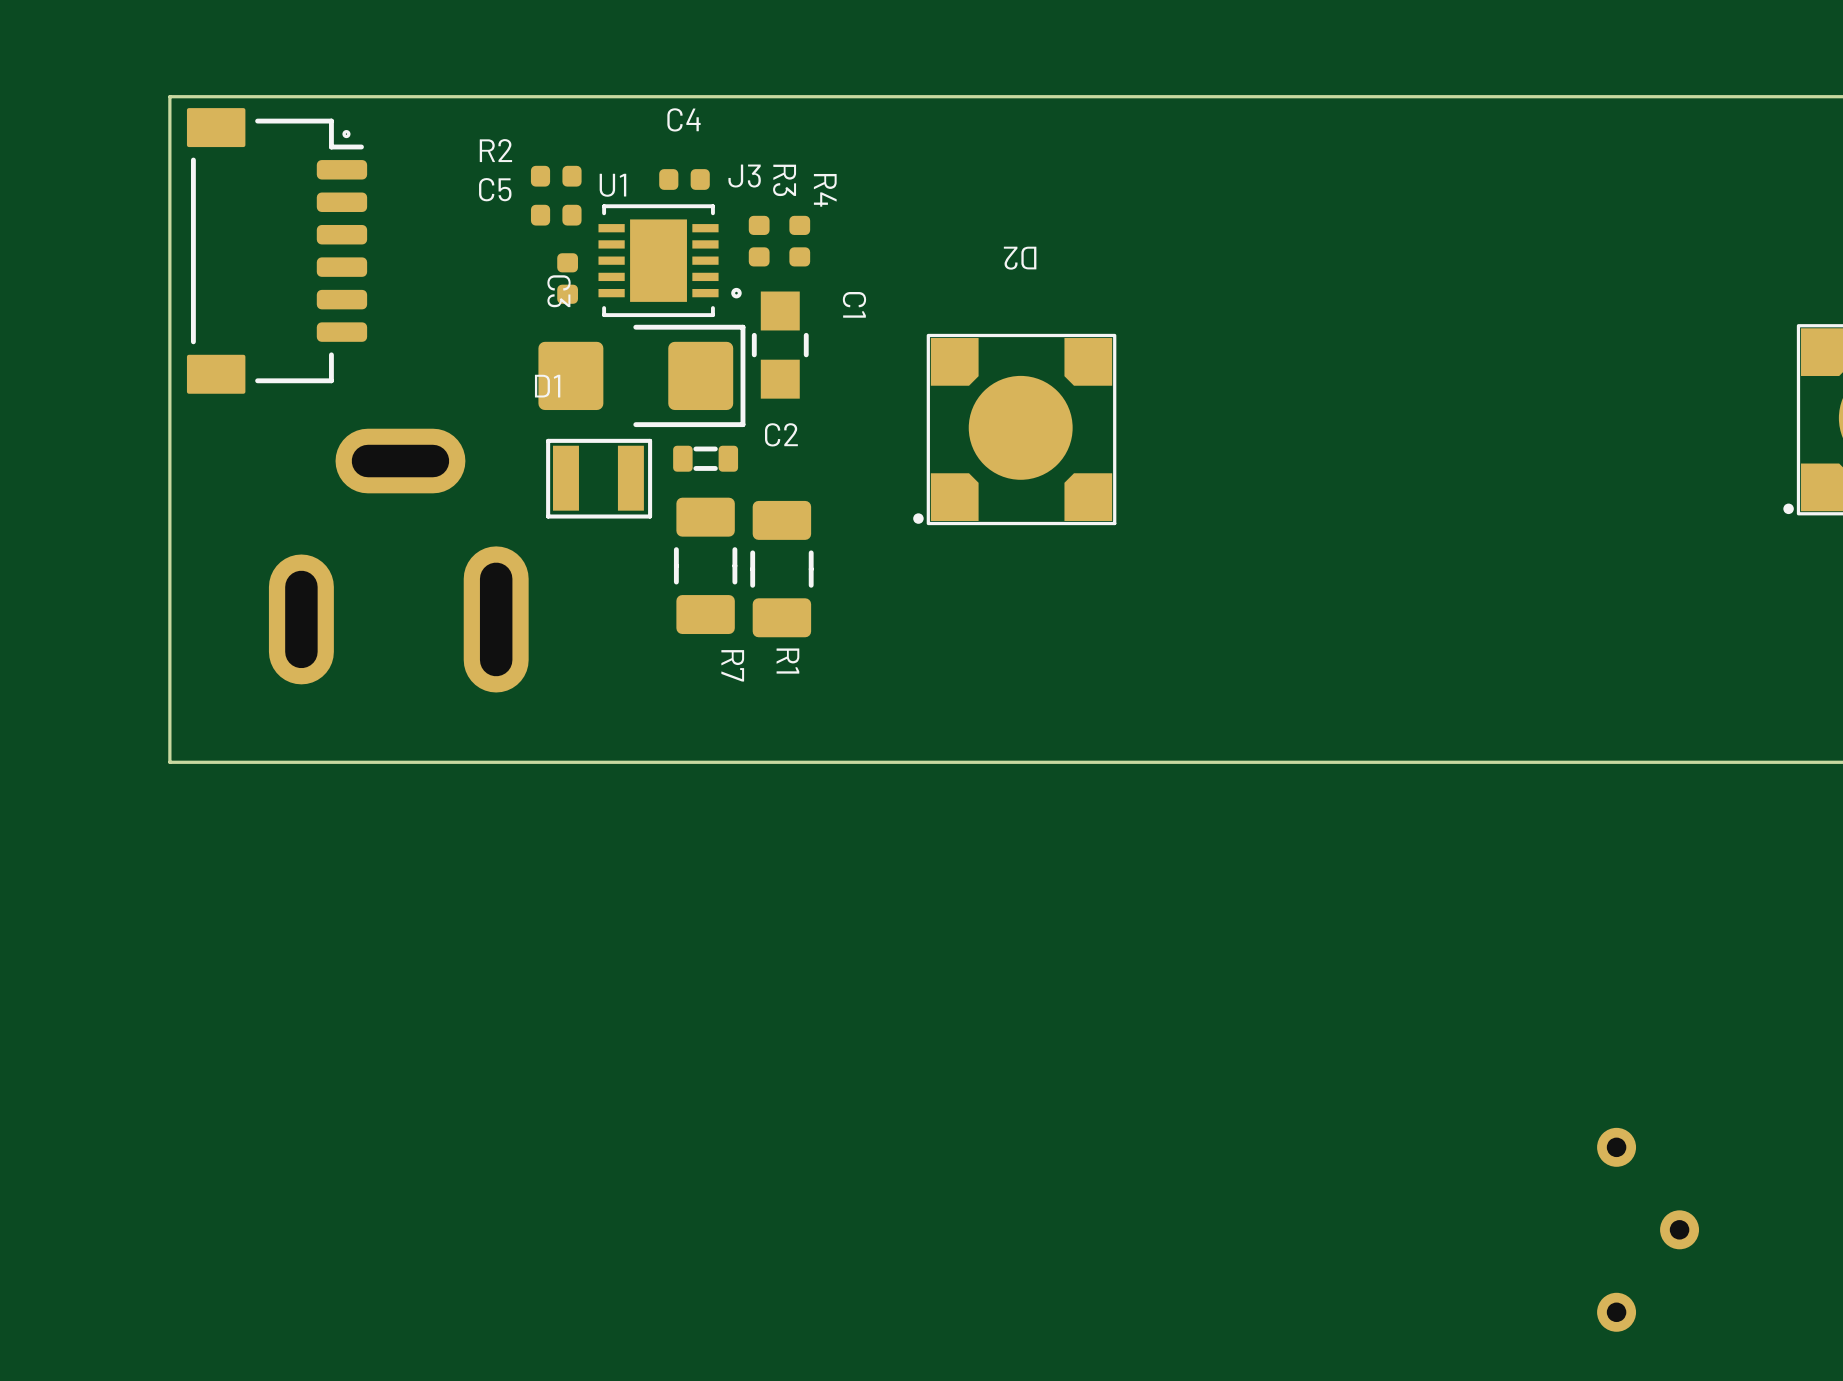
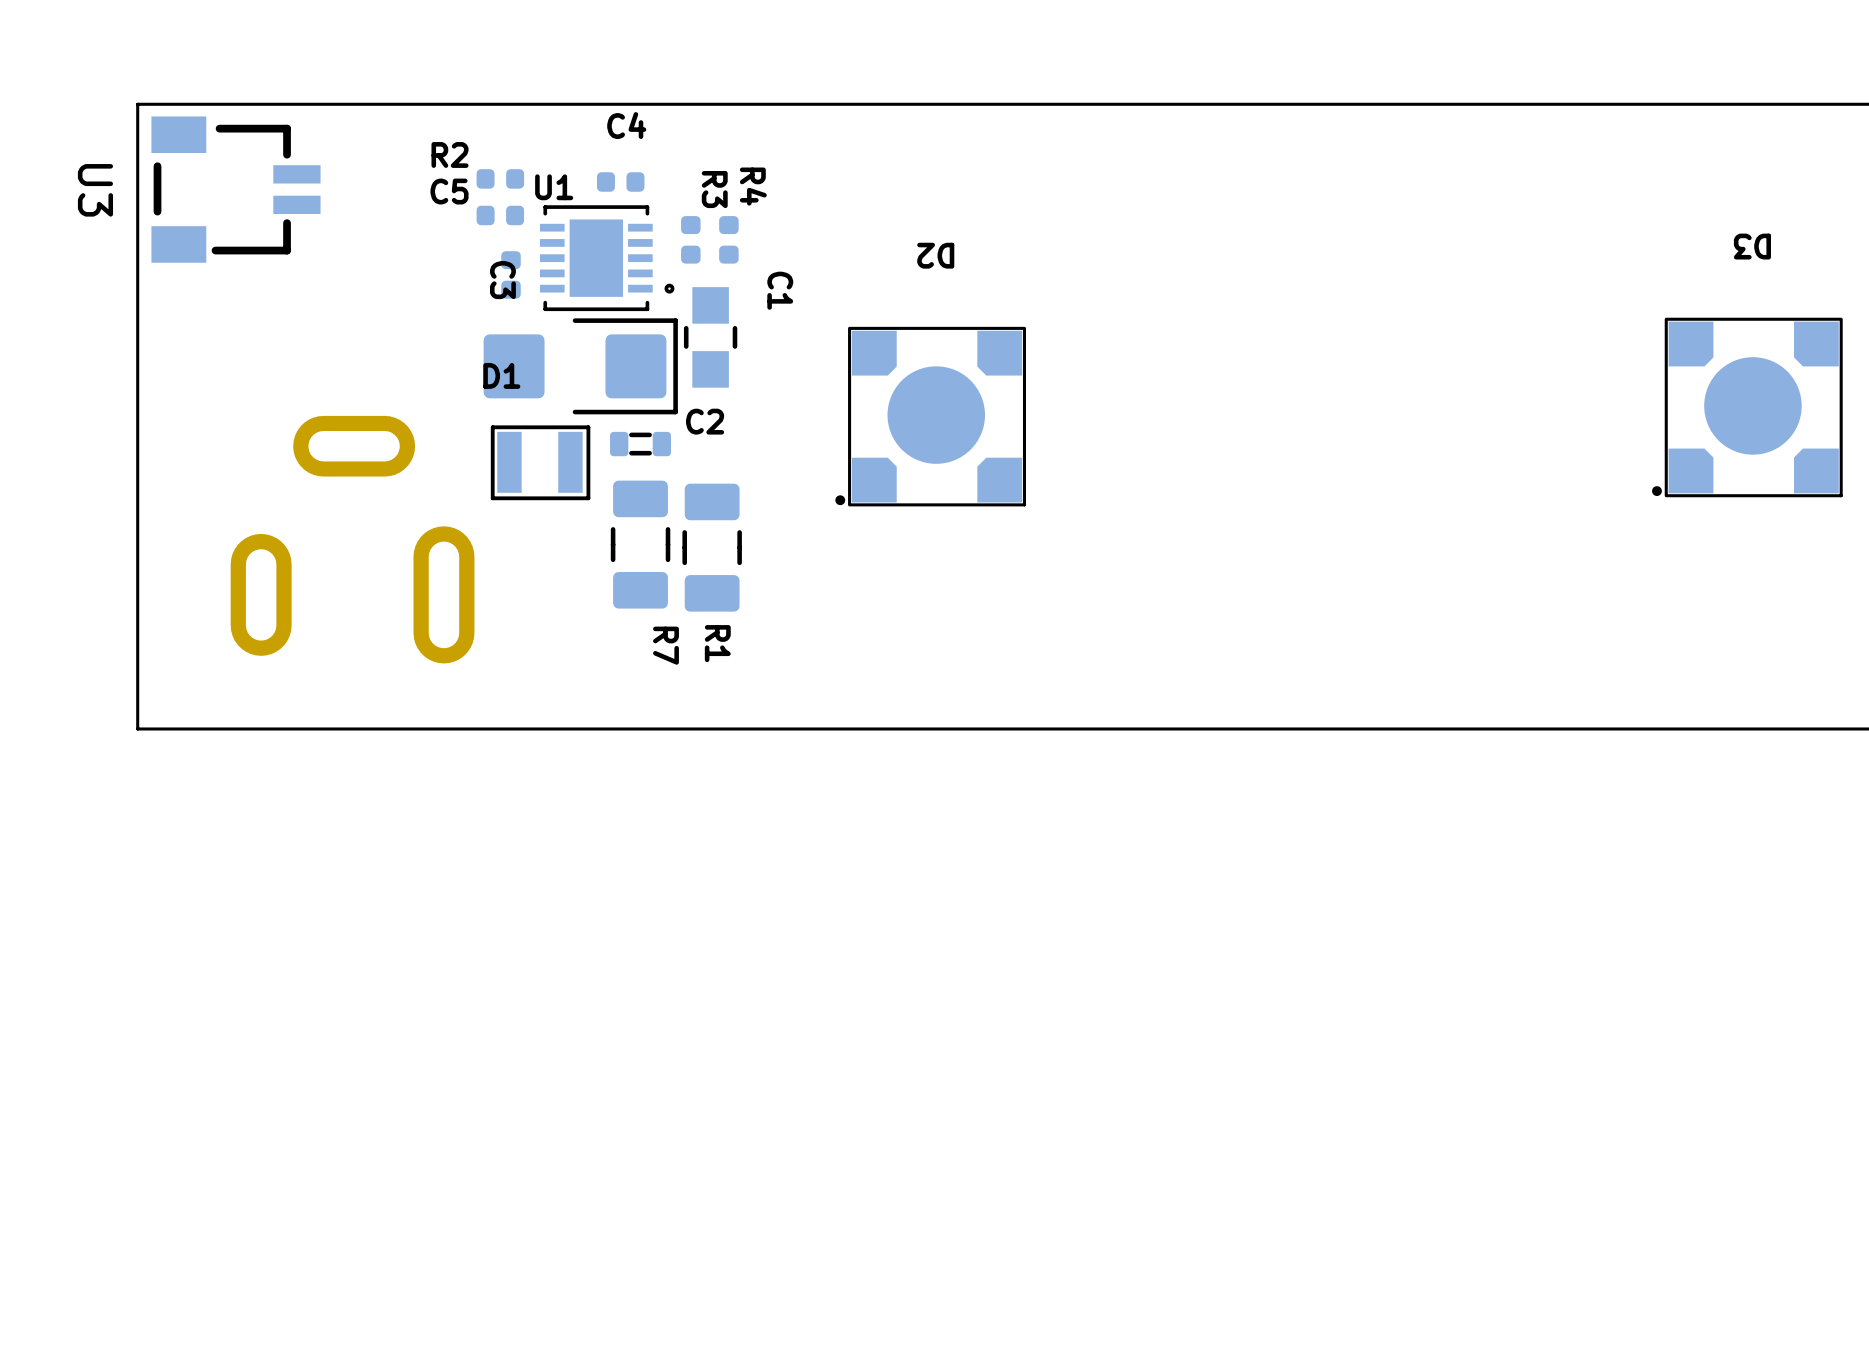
U3: none -> (235, 189)
J3: (277, 250) -> none
part: (1648, 1229) -> none

